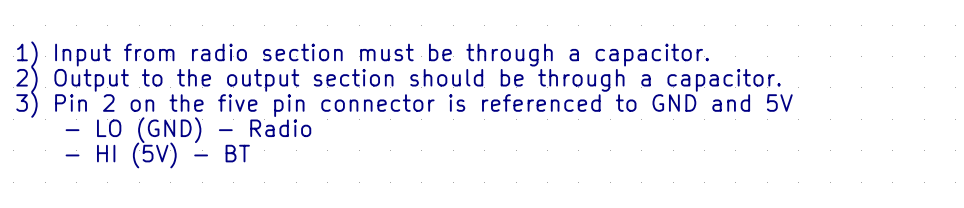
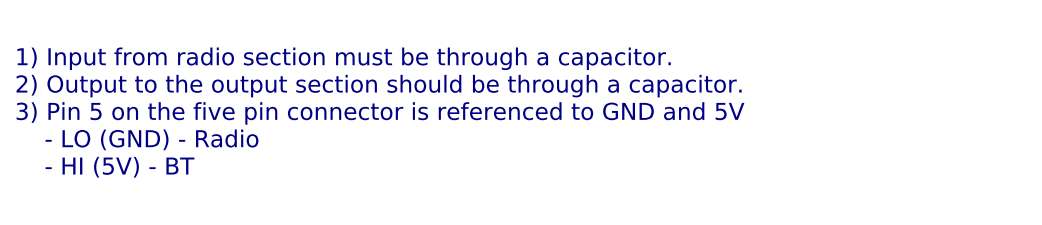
text: 3) Pin 2 on the five pin connector is referenced to GND and 5V (404, 104) -> 3) Pin 5 on the five pin connector is referenced to GND and 5V (380, 113)

